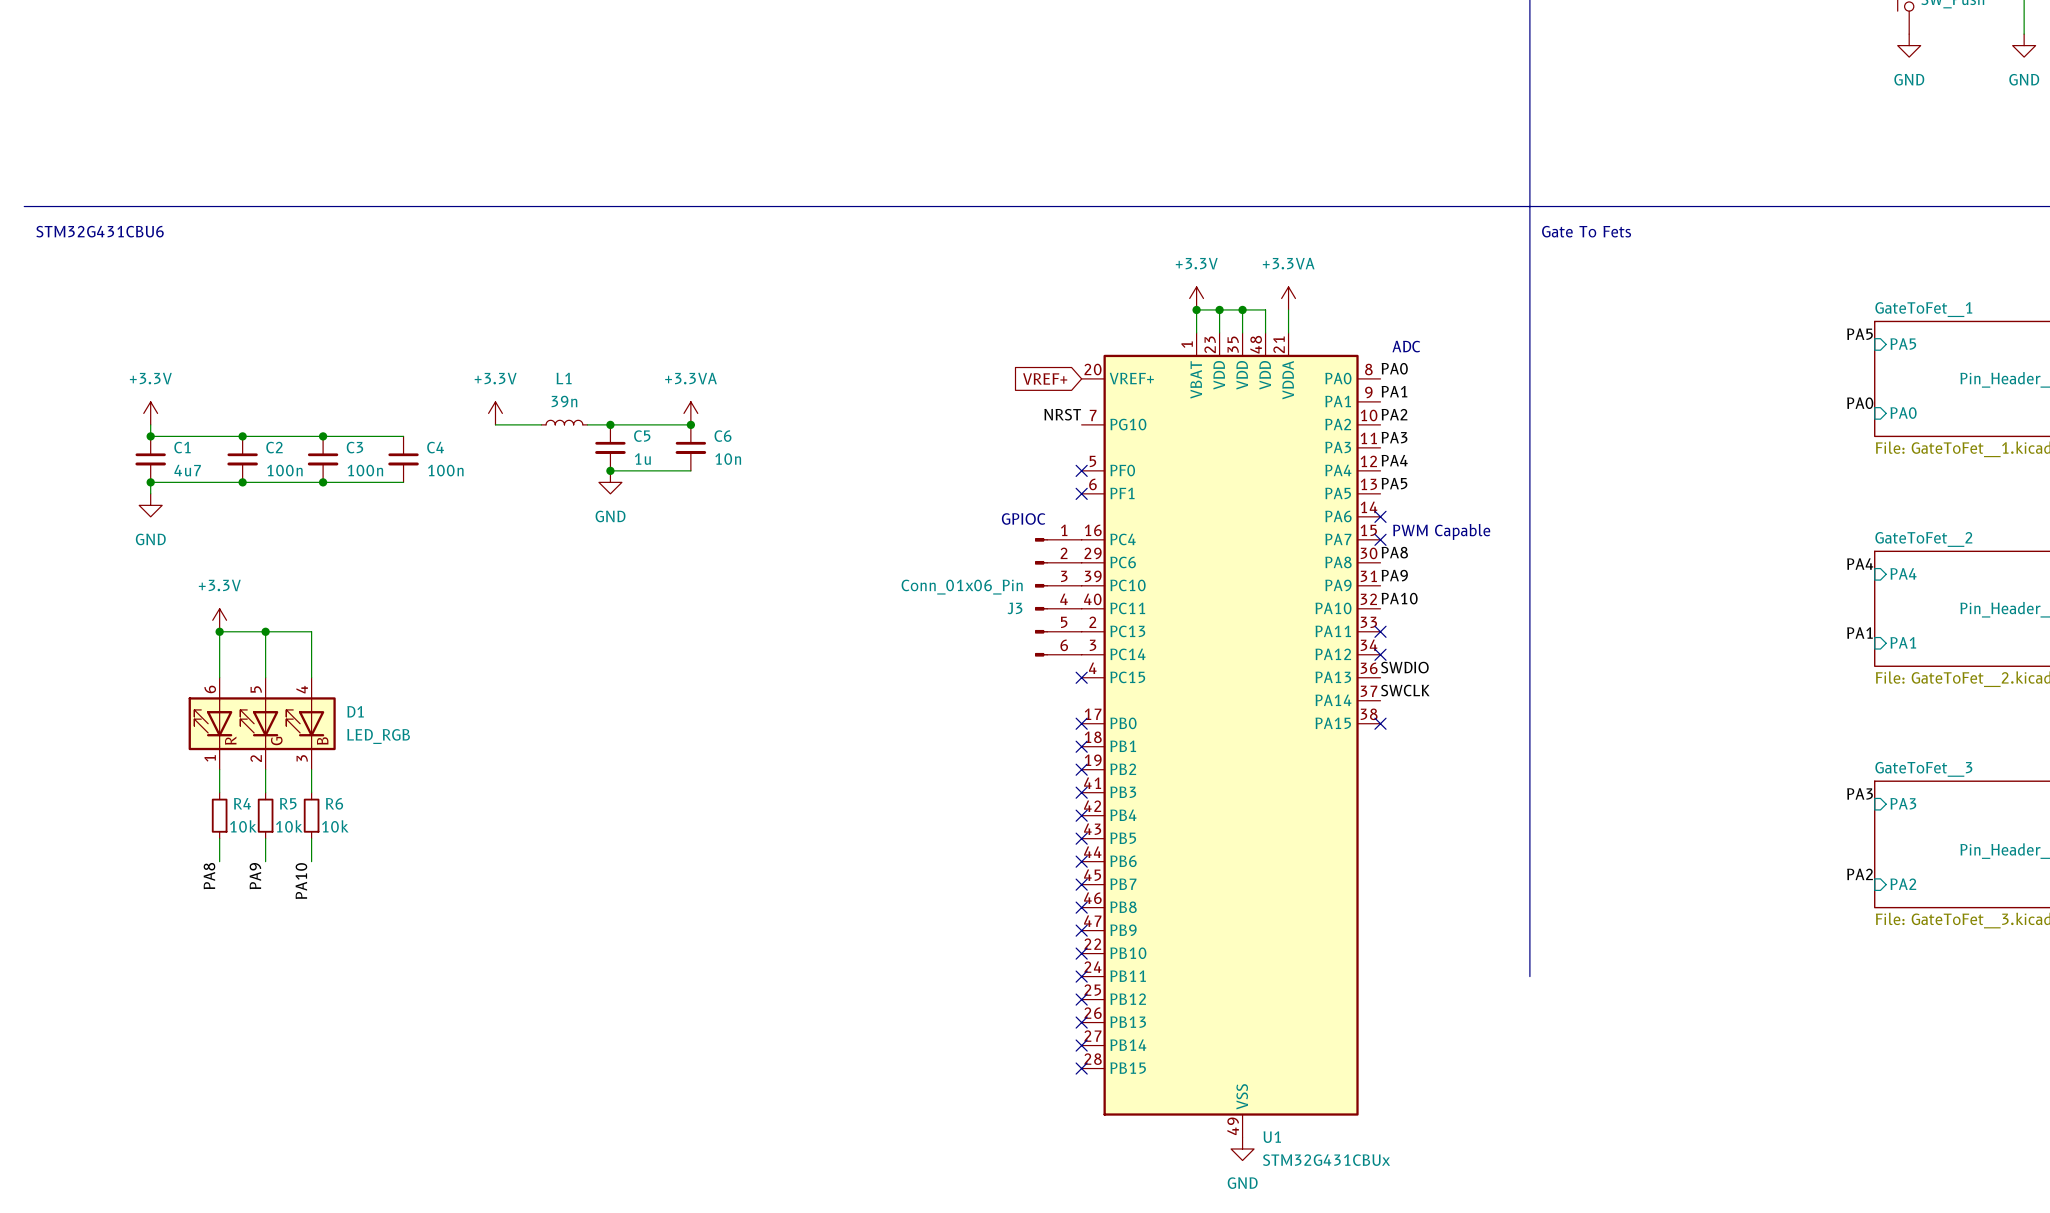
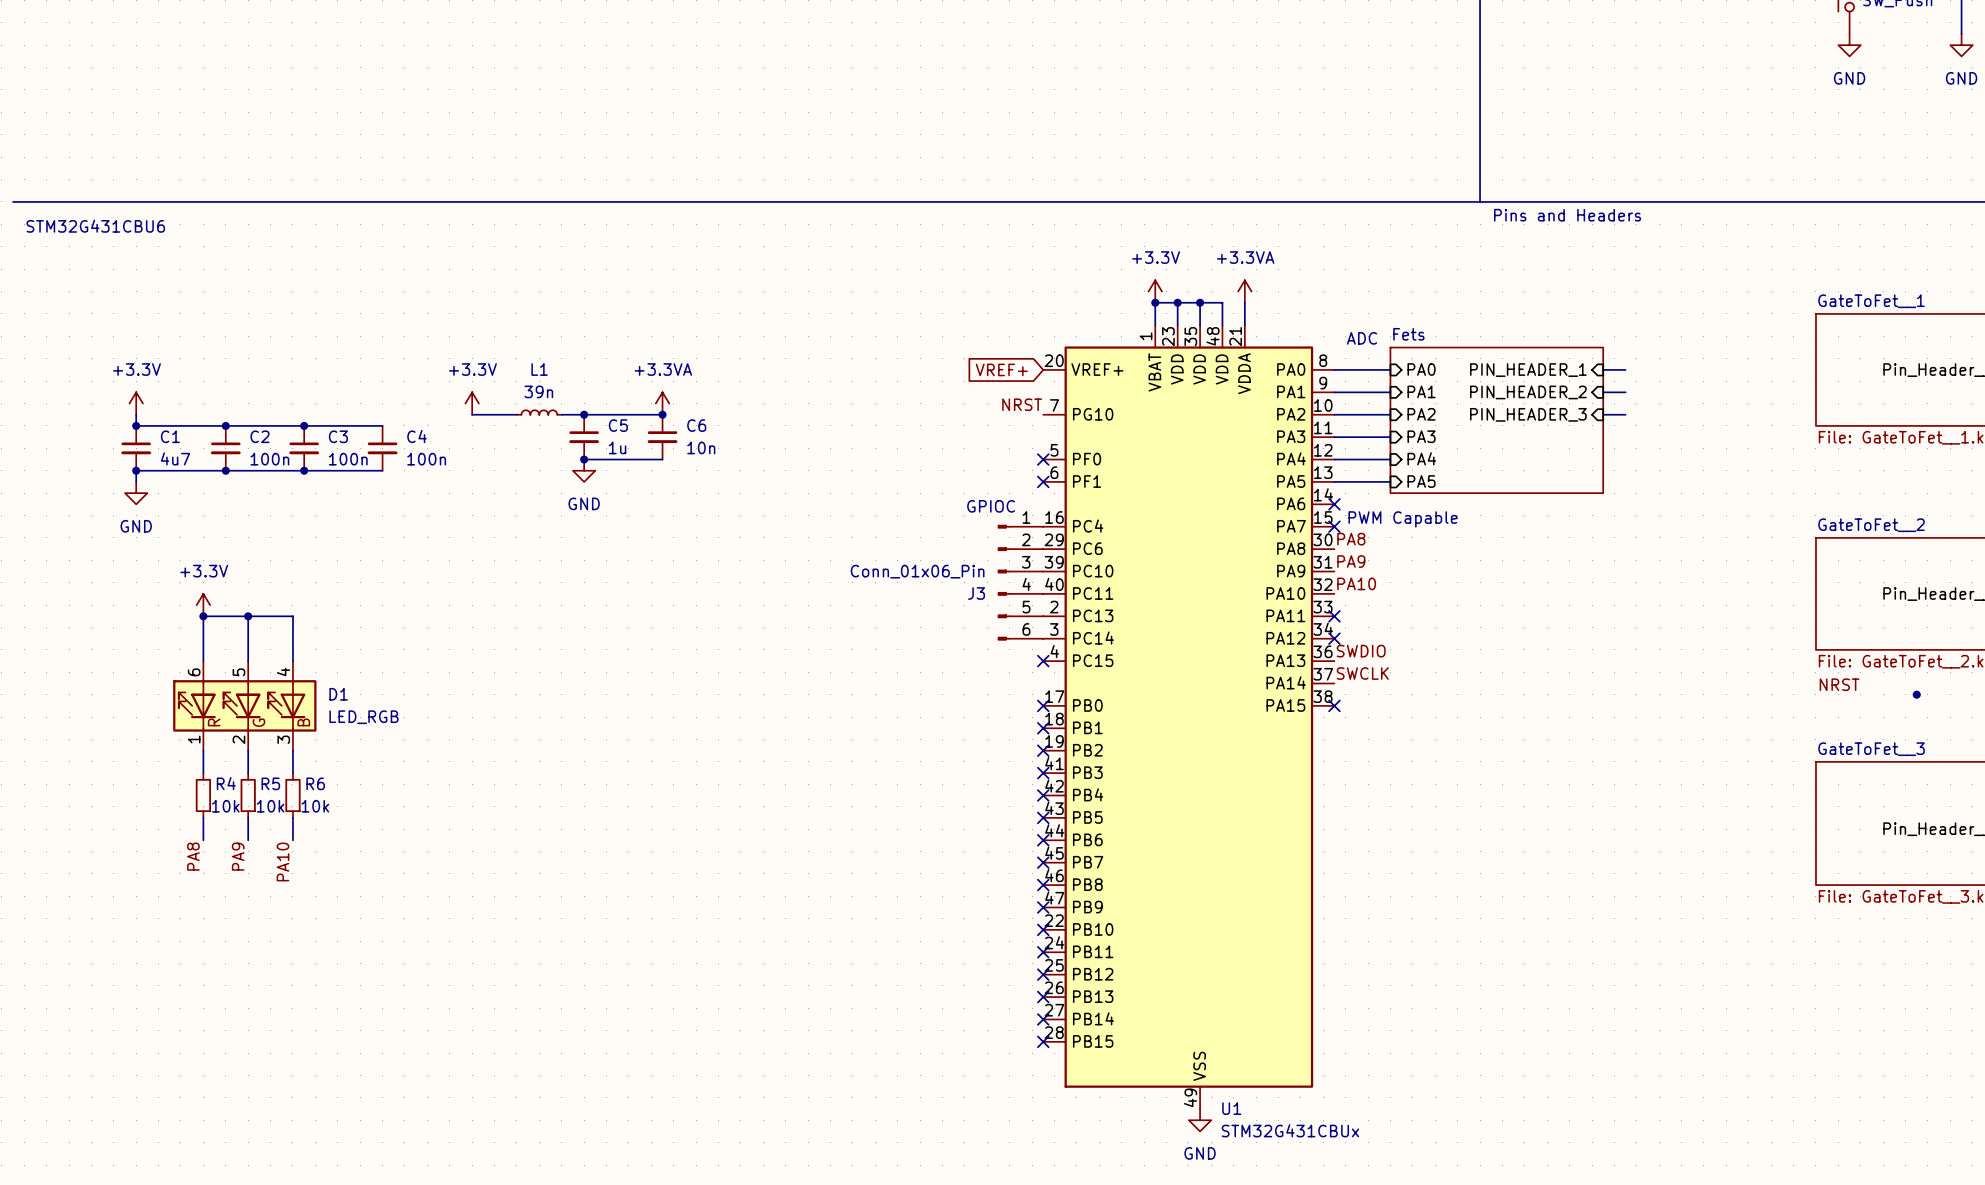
line: (1529, 206) (1529, 976) -> none
text: none -> Pins and Headers (1567, 215)
text: Gate To Fets (1586, 231) -> none
label: PA5 (1859, 334) -> none
sheet pin: PA5 (1903, 344) -> none
label: PA0 (1394, 368) -> none
wire: none -> (1334, 369) (1390, 369)
sheet pin: none -> PA0 (1421, 369)
wire: none -> (1603, 369) (1625, 369)
sheet pin: none -> PIN_HEADER_1 (1528, 370)
label: PA1 (1394, 391) -> none
wire: none -> (1334, 392) (1390, 392)
sheet pin: none -> PA1 (1421, 391)
wire: none -> (1603, 392) (1625, 392)
sheet pin: none -> PIN_HEADER_2 (1528, 392)
label: PA0 (1860, 403) -> none
sheet pin: PA0 (1903, 413) -> none
label: PA2 (1394, 414) -> none
wire: none -> (1334, 414) (1390, 414)
sheet pin: none -> PA2 (1421, 414)
wire: none -> (1603, 414) (1625, 414)
sheet pin: none -> PIN_HEADER_3 (1528, 414)
sheet Fets: none -> (1496, 420)
label: PA3 (1394, 437) -> none
wire: none -> (1334, 437) (1390, 437)
sheet pin: none -> PA3 (1421, 436)
label: PA4 (1394, 460) -> none
wire: none -> (1334, 459) (1390, 459)
sheet pin: none -> PA4 (1421, 458)
label: PA5 (1394, 483) -> none
wire: none -> (1334, 481) (1390, 481)
sheet pin: none -> PA5 (1421, 481)
label: PA4 (1860, 564) -> none
sheet pin: PA4 (1903, 573) -> none
label: PA1 (1859, 633) -> none
sheet pin: PA1 (1903, 642) -> none
label: none -> NRST (1839, 684)
junction: none -> (1916, 694)
label: PA3 (1860, 793) -> none
sheet pin: PA3 (1903, 803) -> none
label: PA2 (1860, 874) -> none
sheet pin: PA2 (1903, 884) -> none

